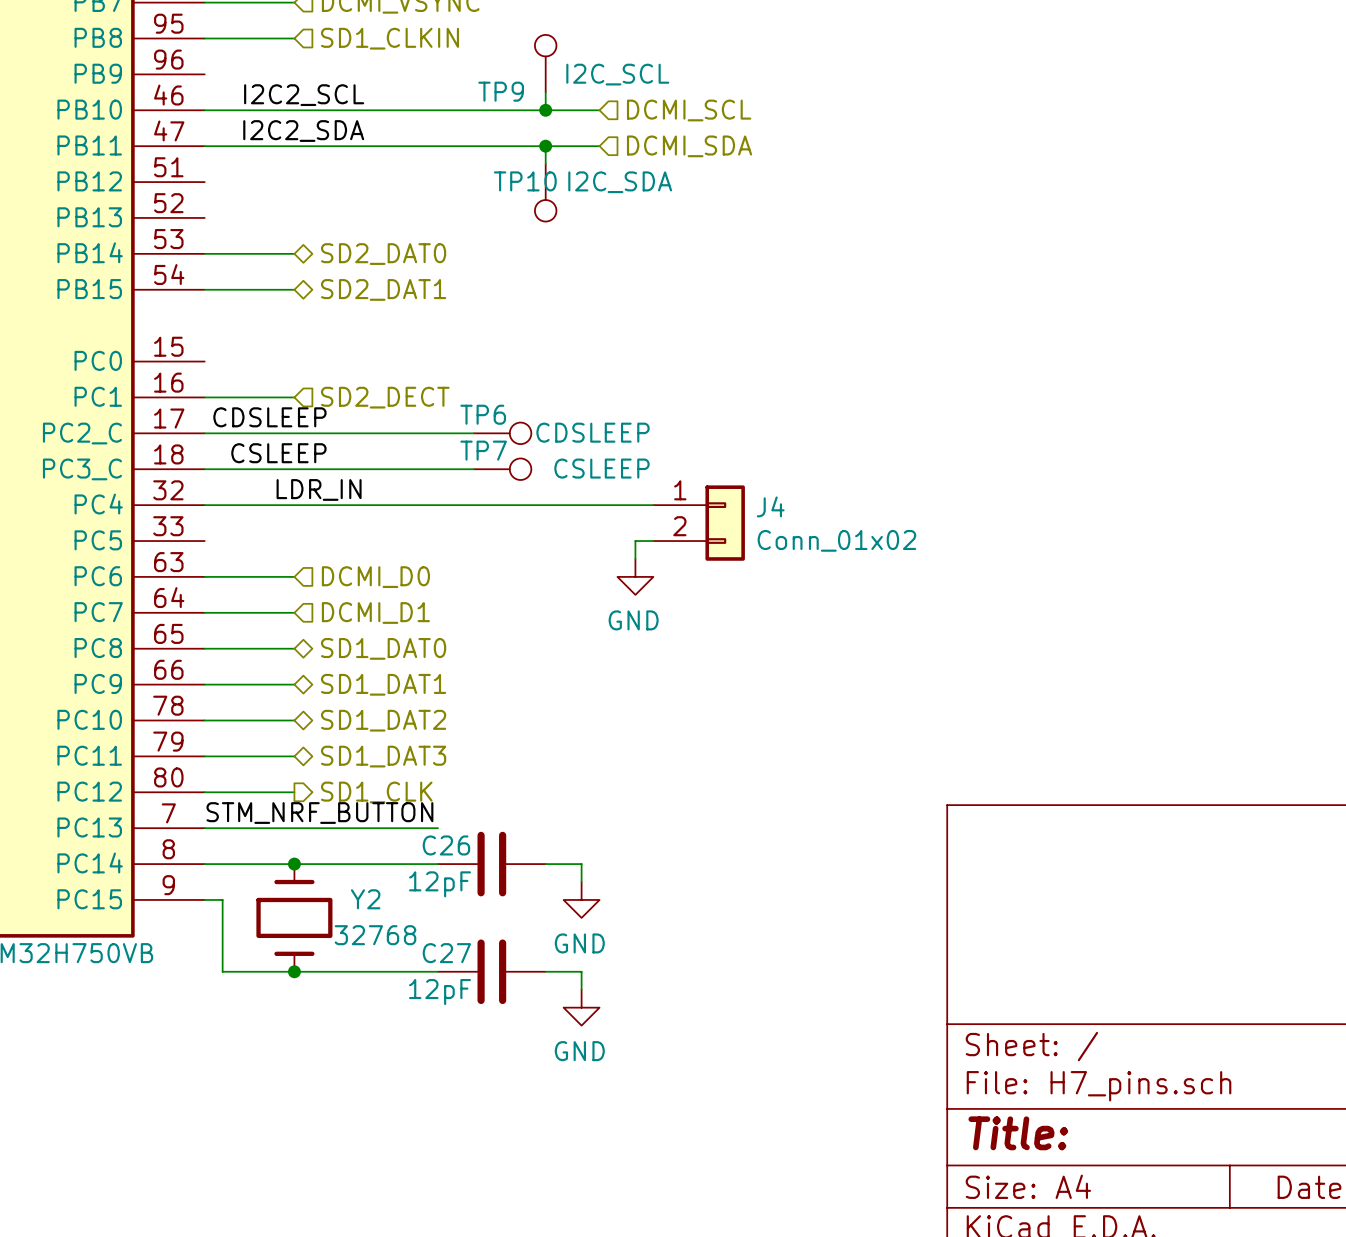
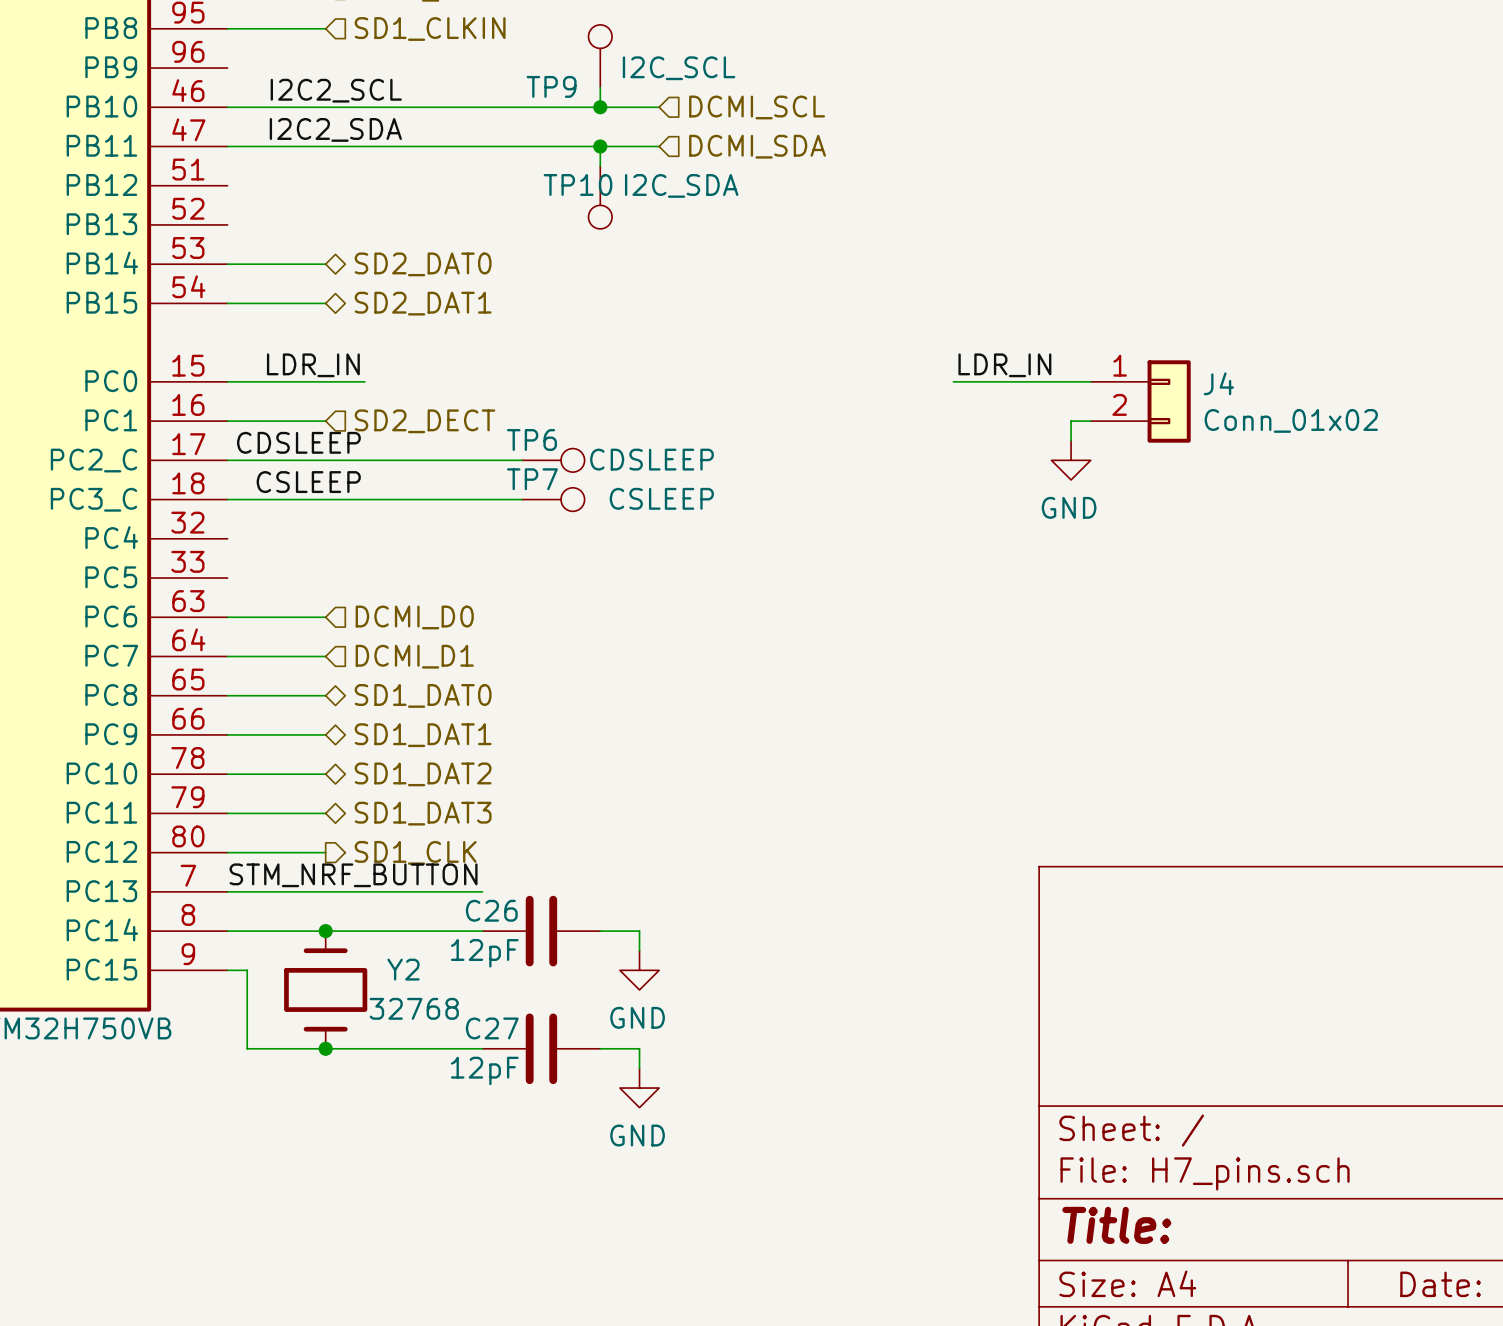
label: none -> LDR_IN (1004, 365)
wire: none -> (227, 381) (364, 381)
wire: none -> (953, 381) (1090, 381)
wire: none -> (1090, 421) (1071, 421) (1071, 440)
power symbol: none -> GND (1071, 460)
label position: LDR_IN (319, 489) -> LDR_IN (313, 365)
wire: (204, 505) (653, 505) -> none
J4 position: (699, 523) -> (1140, 401)
wire: (653, 541) (635, 541) (635, 558) -> none
power symbol: GND (635, 576) -> none

